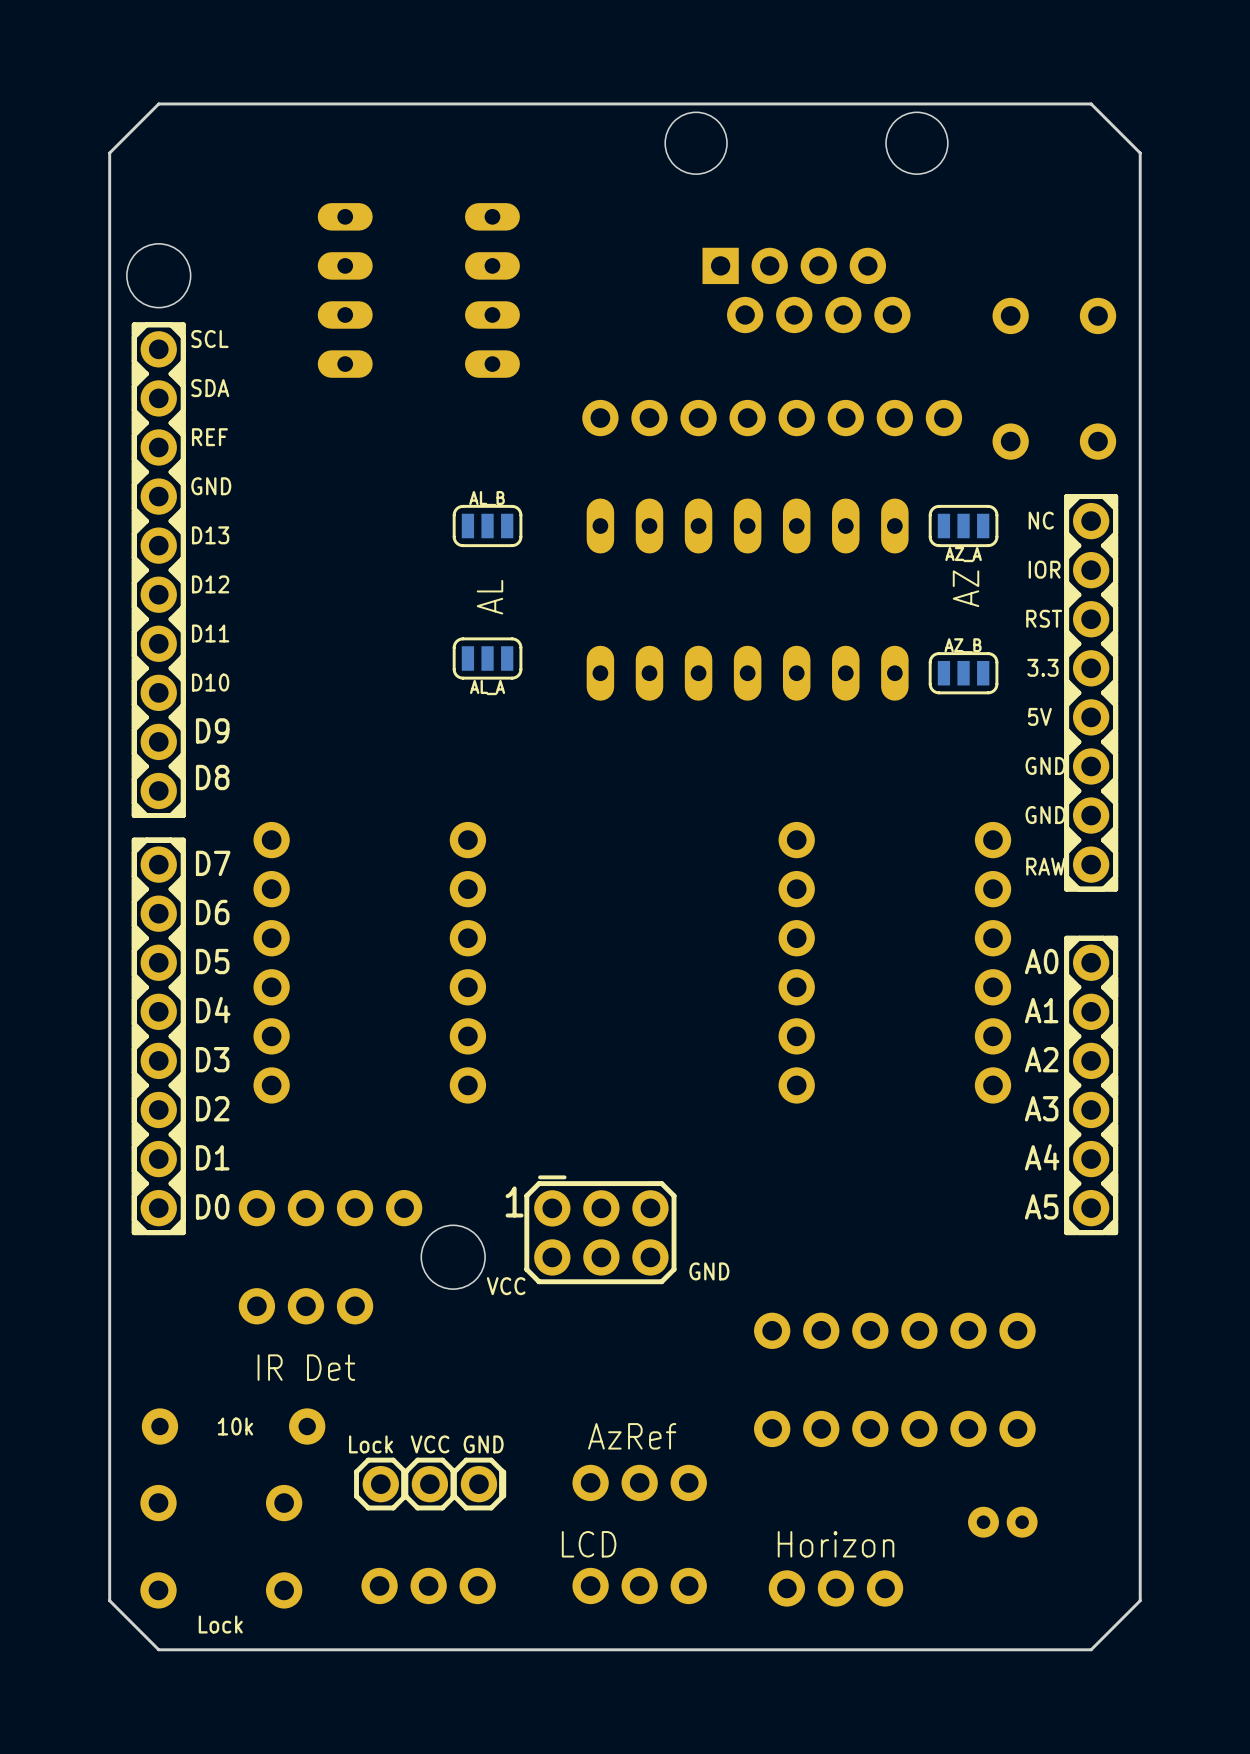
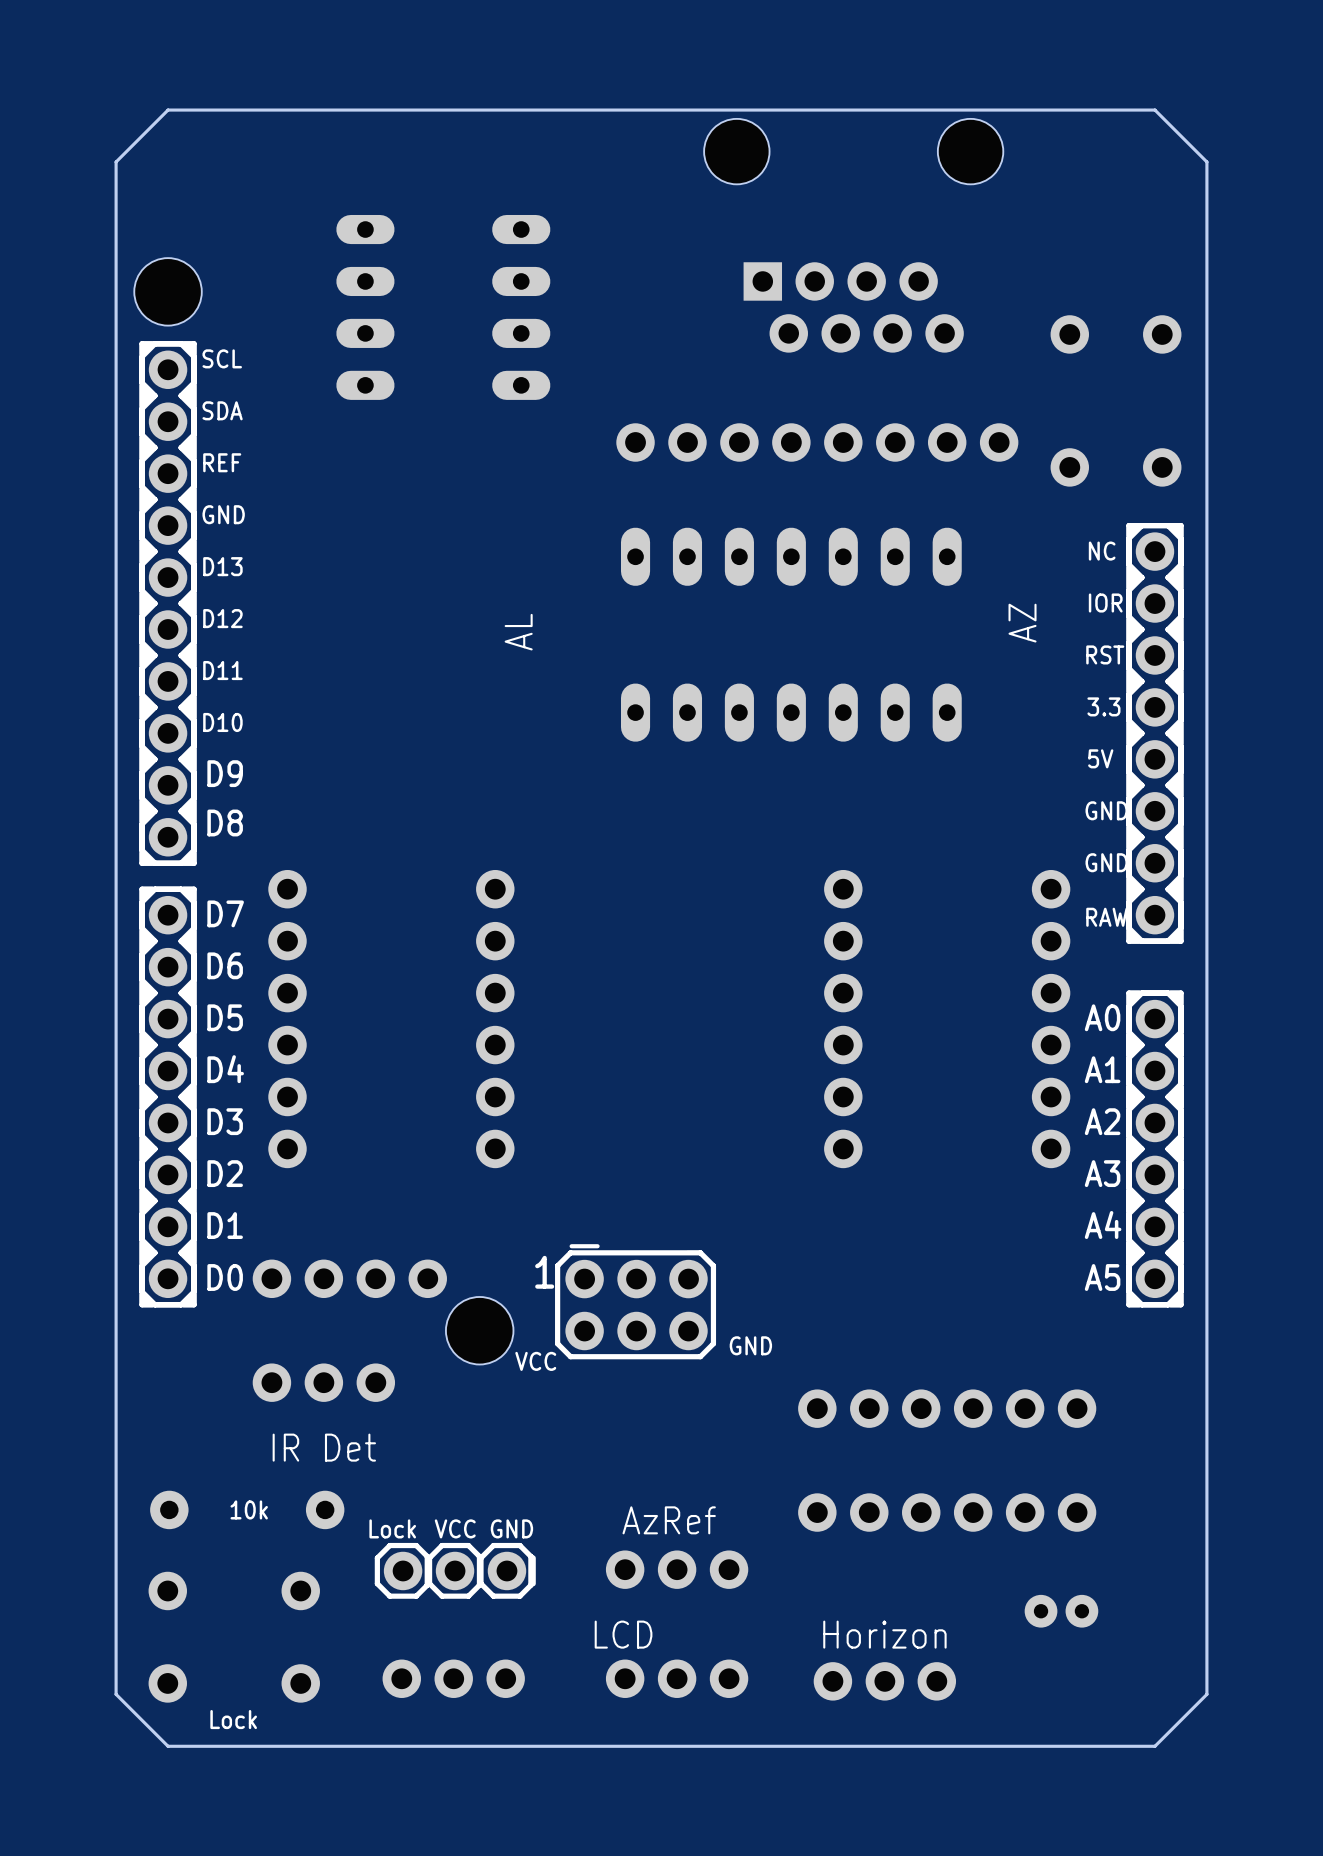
AL_B: (487, 526) -> none
AZ_A: (963, 526) -> none
AL_A: (487, 658) -> none
AZ_B: (963, 673) -> none

